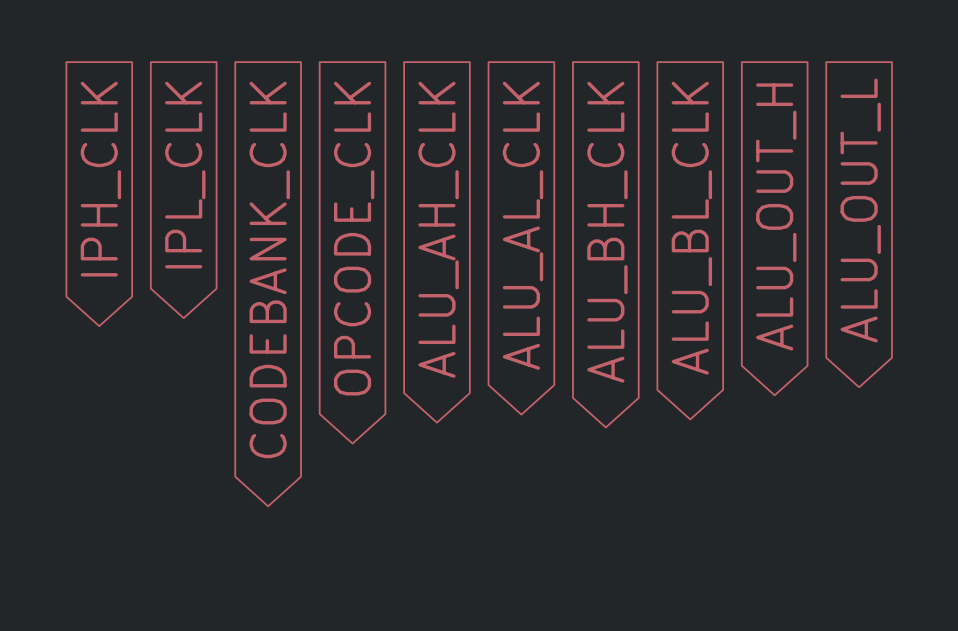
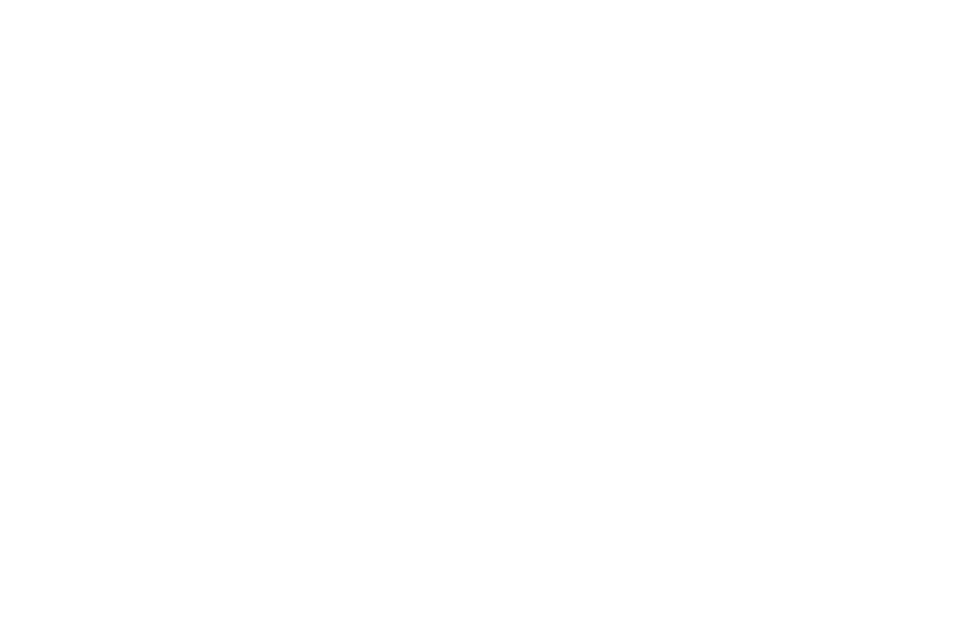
global label: IPL_CLK (185, 175) -> none
global label: IPH_CLK (100, 179) -> none
global label: ALU_OUT_L (860, 210) -> none
global label: ALU_OUT_H (776, 216) -> none
global label: ALU_AL_CLK (523, 225) -> none
global label: ALU_BL_CLK (691, 228) -> none
global label: ALU_AH_CLK (438, 229) -> none
global label: ALU_BH_CLK (607, 232) -> none
global label: OPCODE_CLK (354, 238) -> none
global label: CODEBANK_CLK (269, 269) -> none

